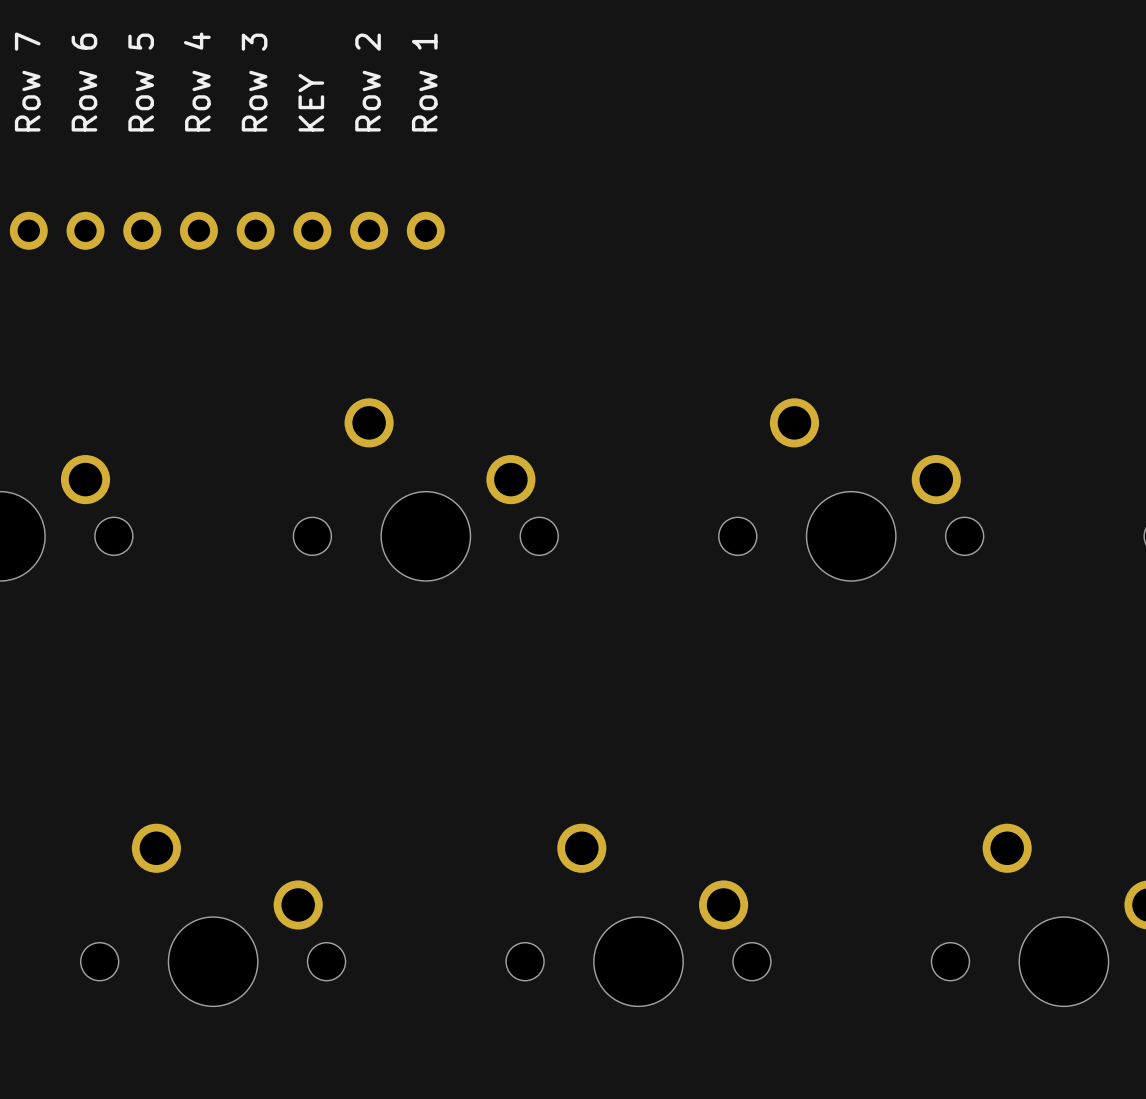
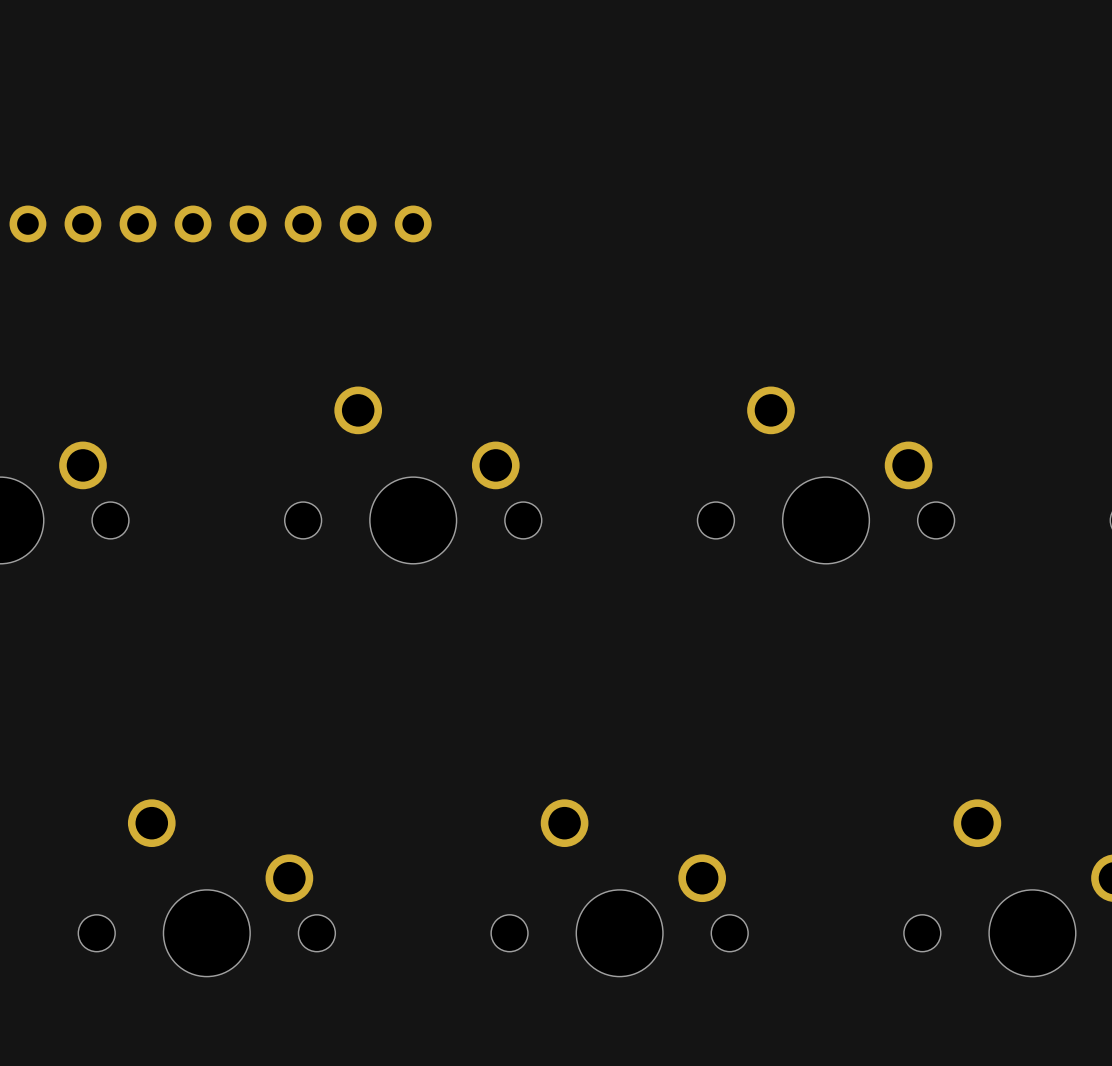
text: Row 7 (27, 82) -> none
text: Row 6 (84, 82) -> none
text: Row 5 (141, 82) -> none
text: Row 4 (197, 82) -> none
text: Row 3 (254, 82) -> none
text: Row 2 (368, 82) -> none
text: Row 1 (424, 82) -> none
text: KEY (311, 102) -> none

